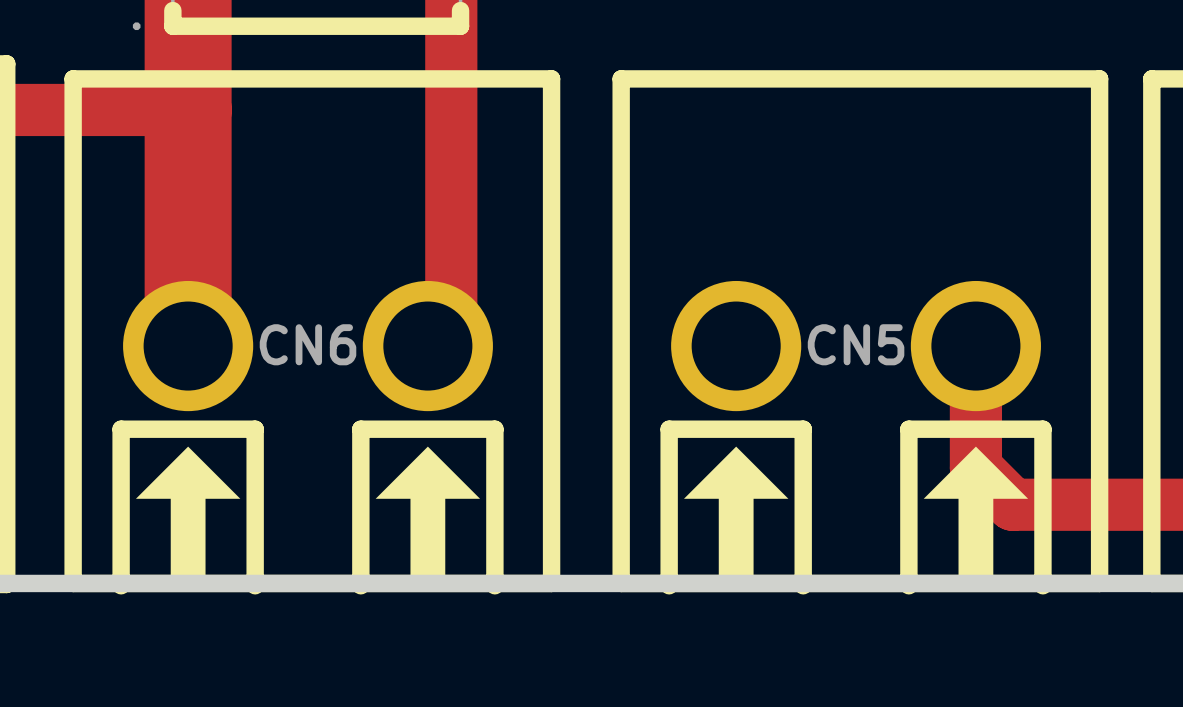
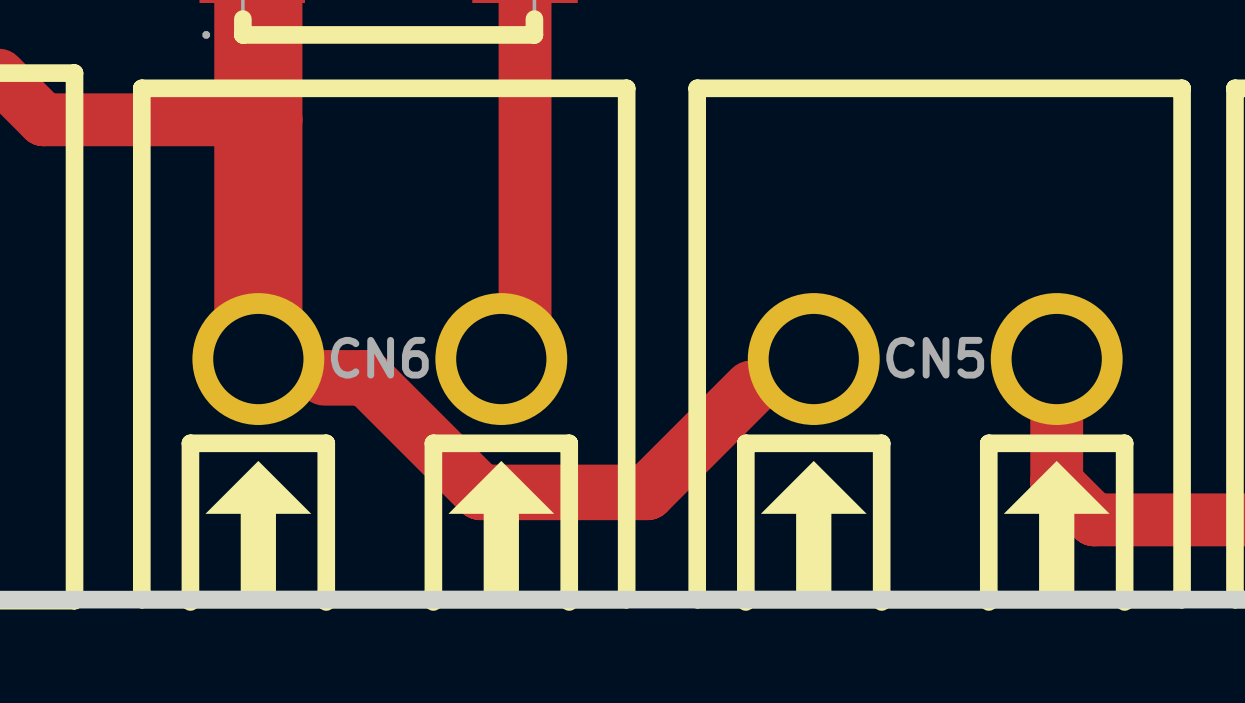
track: none -> (324, 377) (366, 377) (480, 492) (647, 492) (751, 388)

